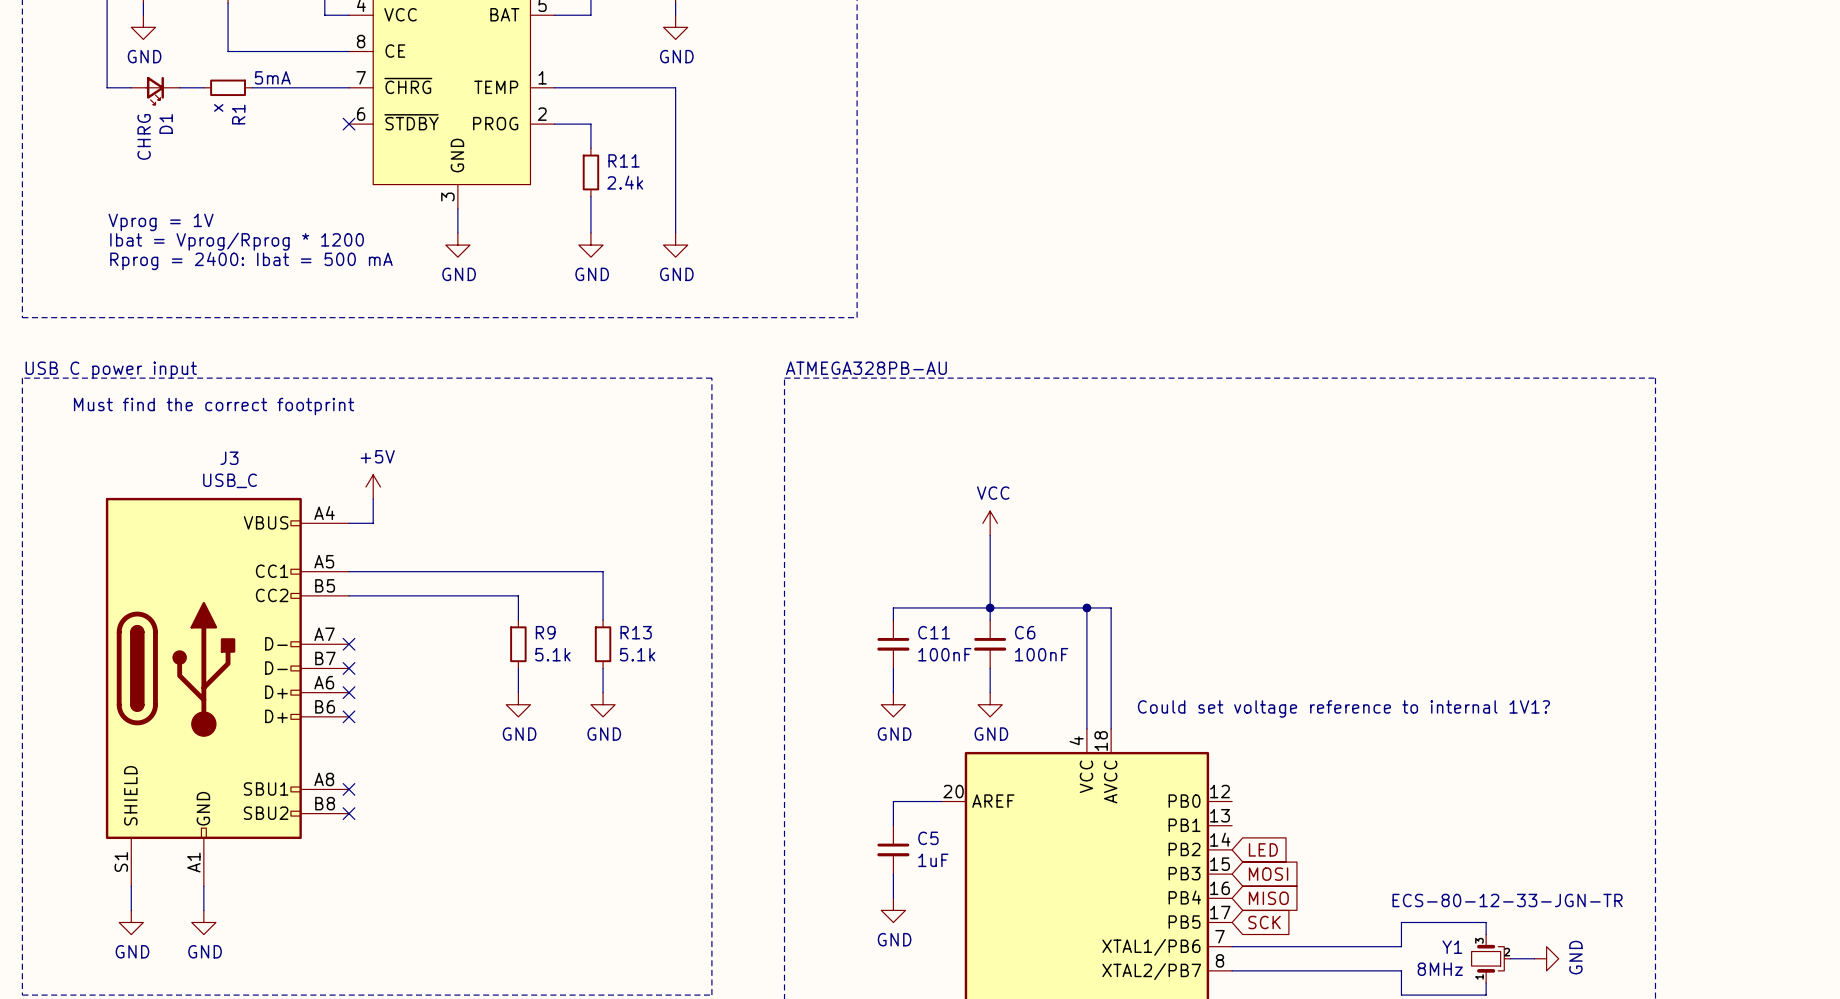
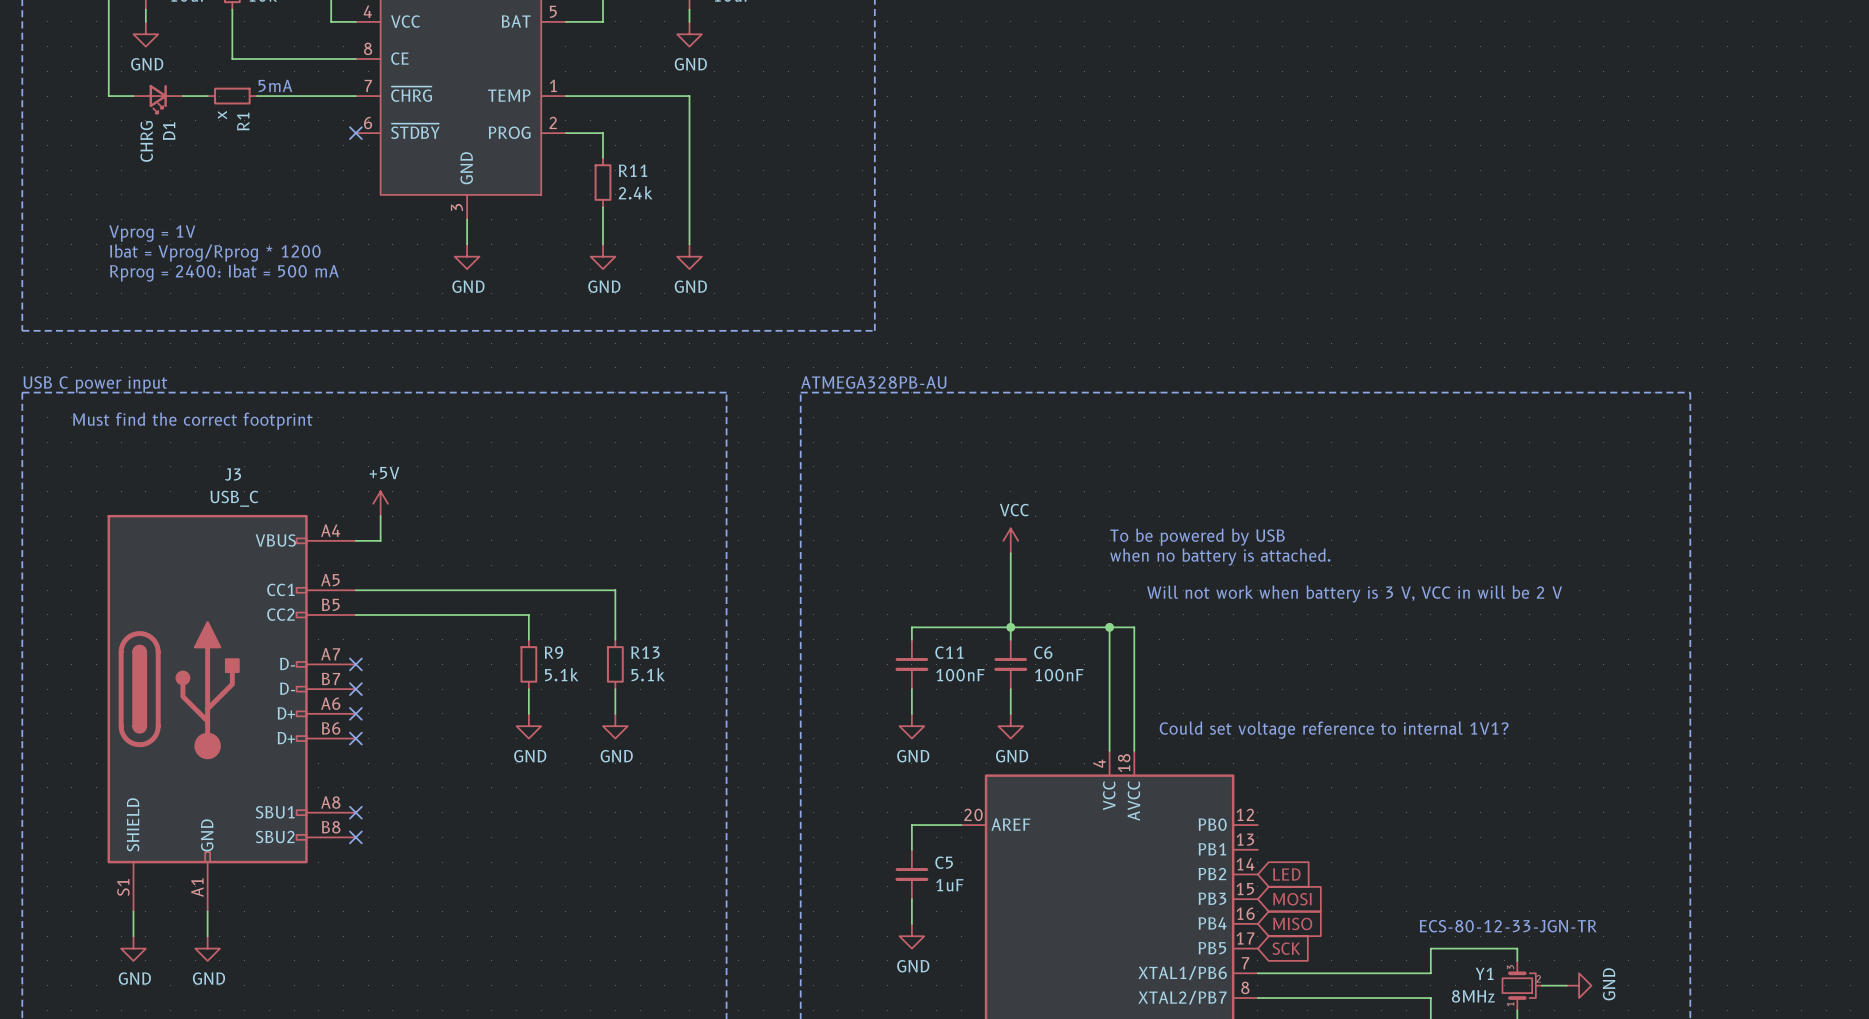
text: none -> To be powered by USB (1197, 537)
text: none -> when no battery is attached. (1220, 556)
text: none -> Will not work when battery is 3 V, VCC in will be 2 V (1354, 594)

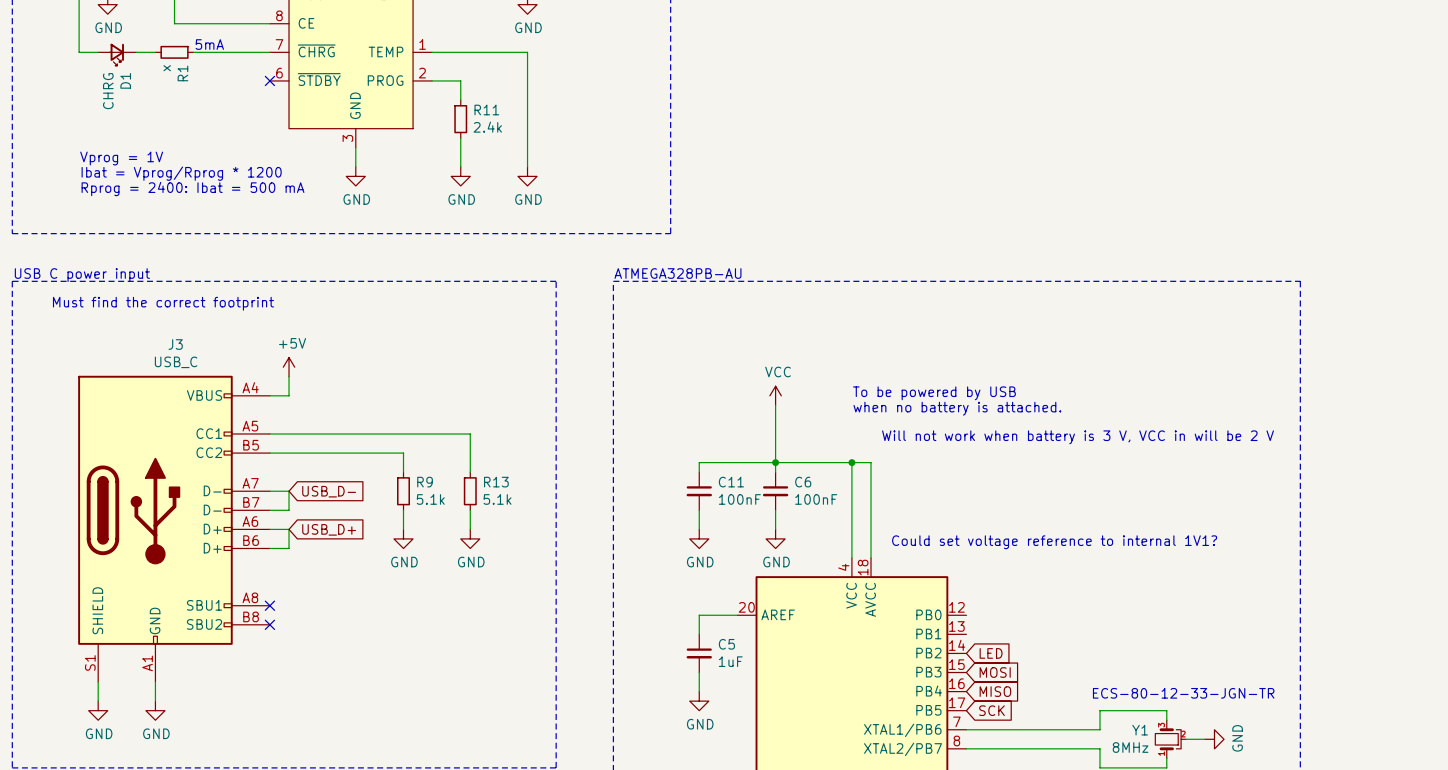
wire: none -> (269, 491) (289, 491) (289, 510) (269, 510)
no-connect mark: (355, 664) -> none
global label: none -> USB_D- (329, 491)
no-connect mark: (355, 689) -> none
wire: none -> (269, 529) (289, 529) (289, 548) (269, 548)
no-connect mark: (355, 713) -> none
global label: none -> USB_D+ (329, 529)
no-connect mark: (355, 738) -> none

